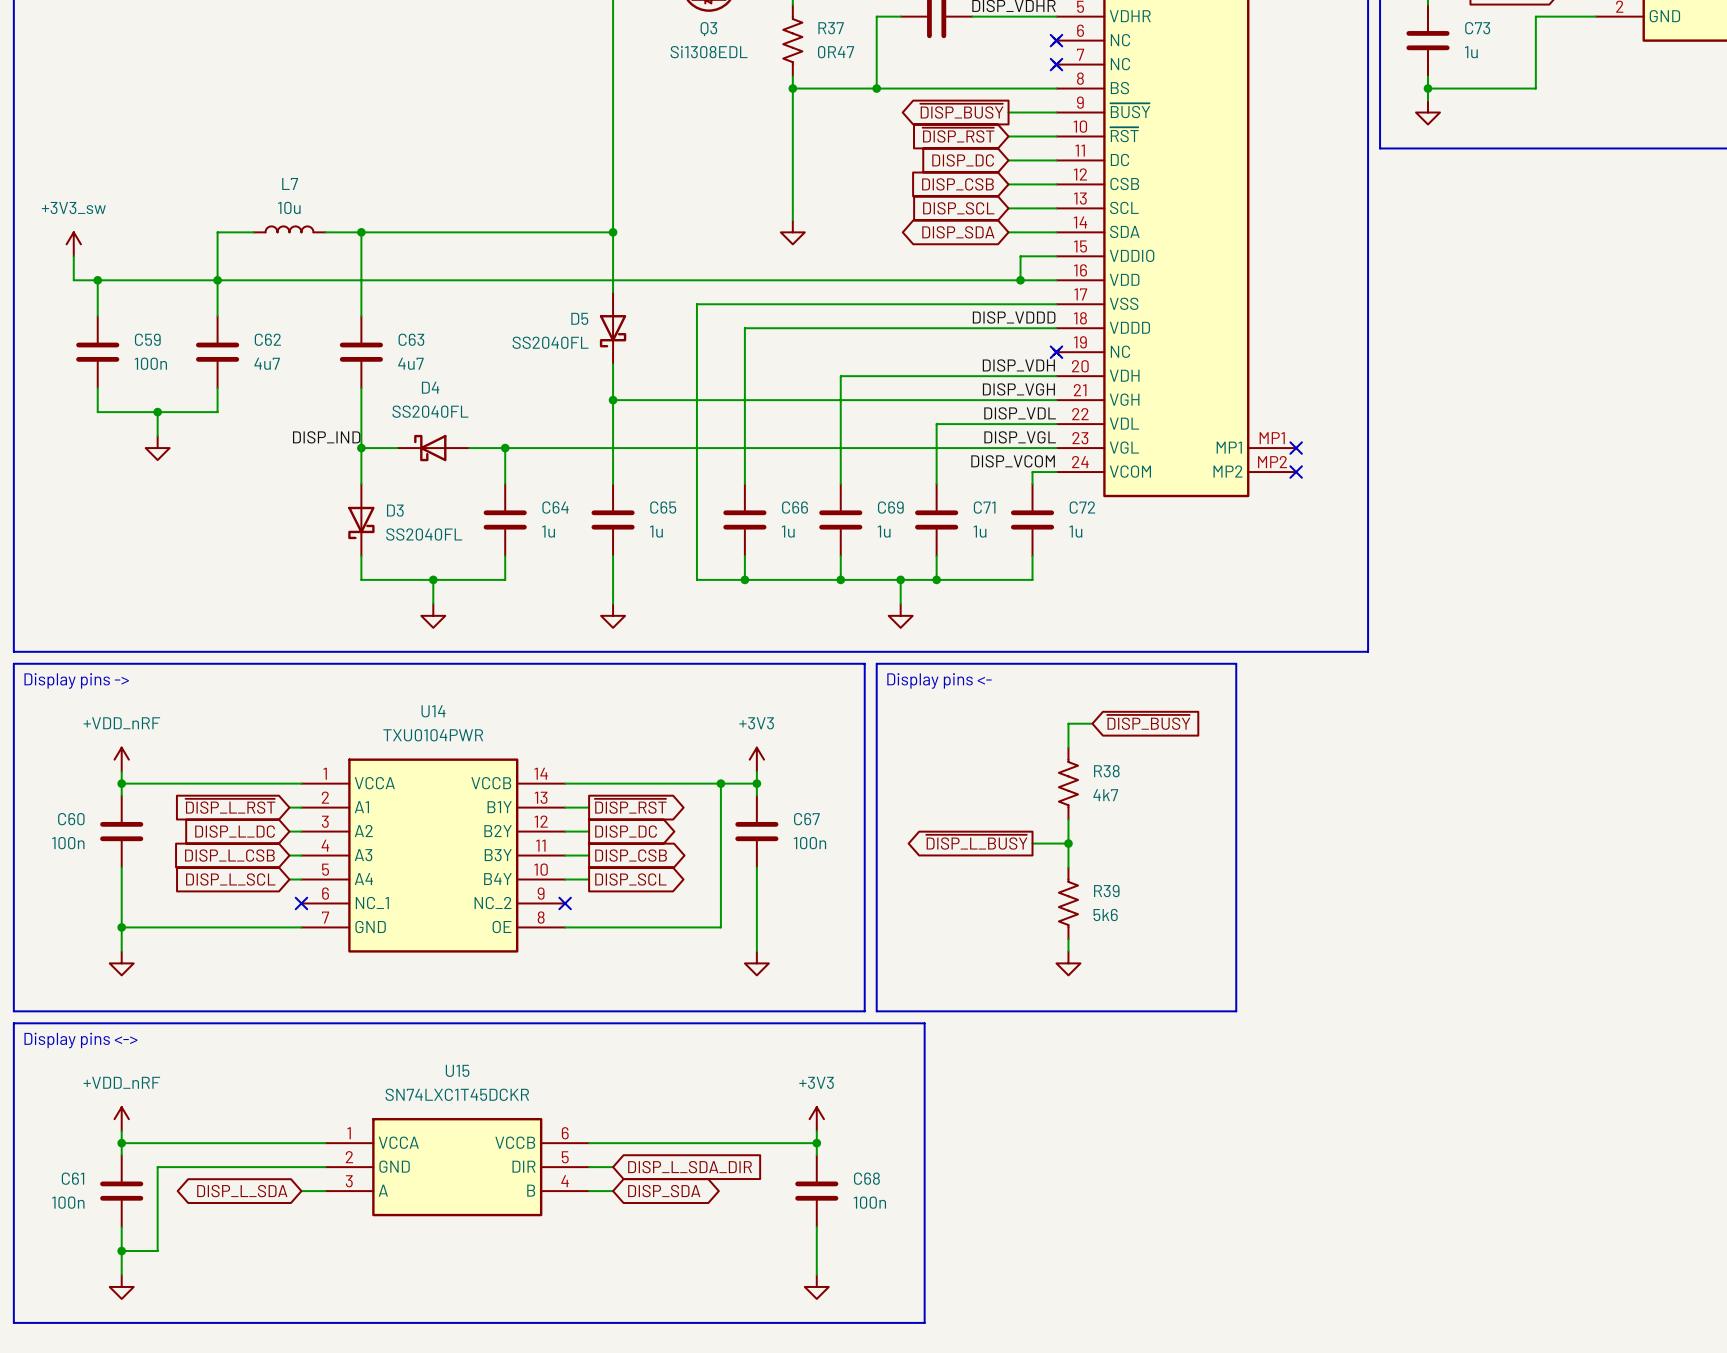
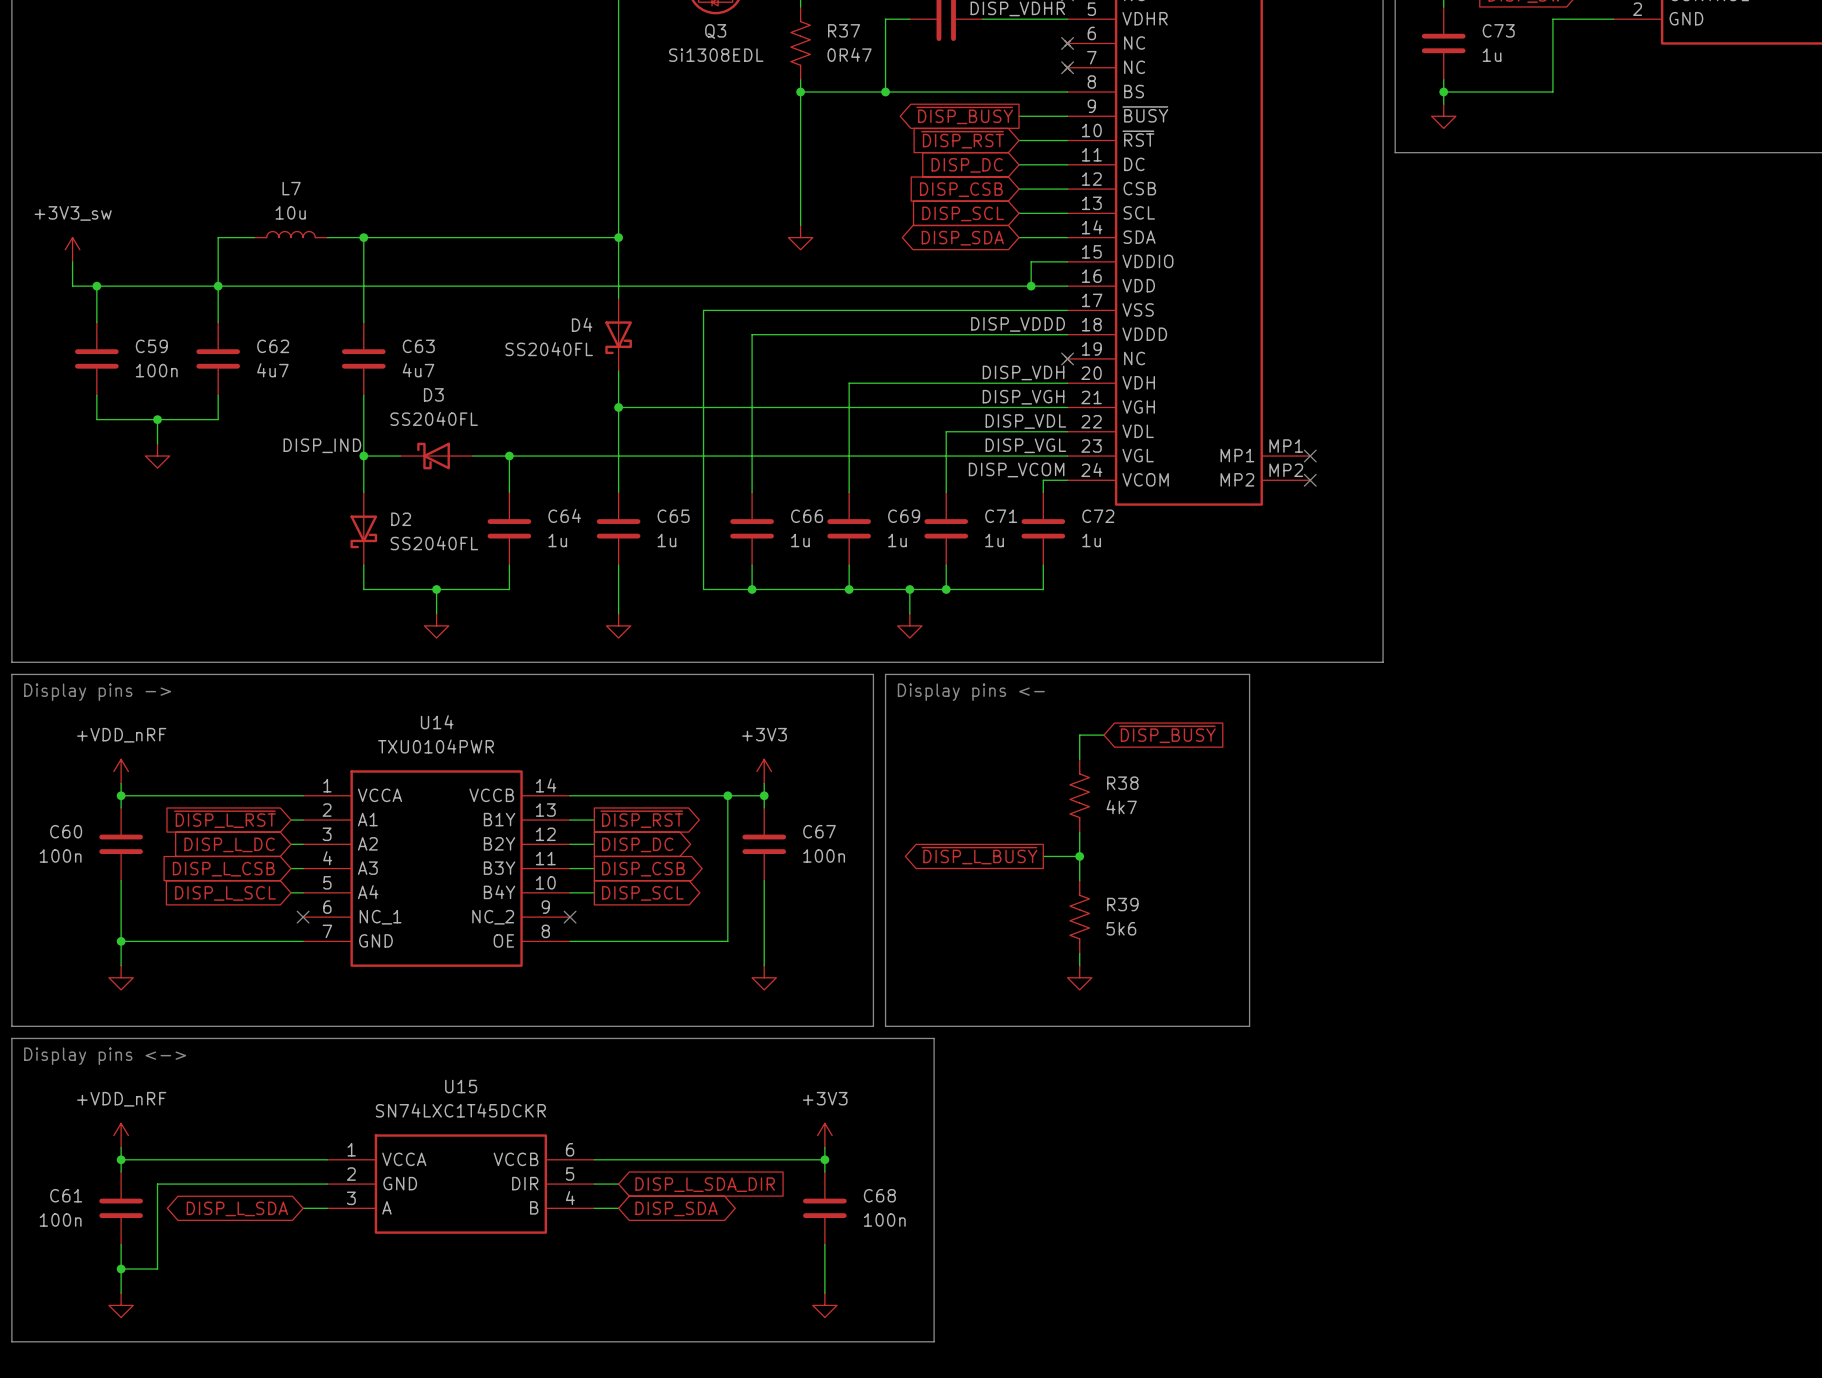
D5 name: D5 (579, 318) -> D4 (582, 324)
D4 name: D4 (430, 387) -> D3 (433, 394)
D3 name: D3 (395, 510) -> D2 (401, 519)

